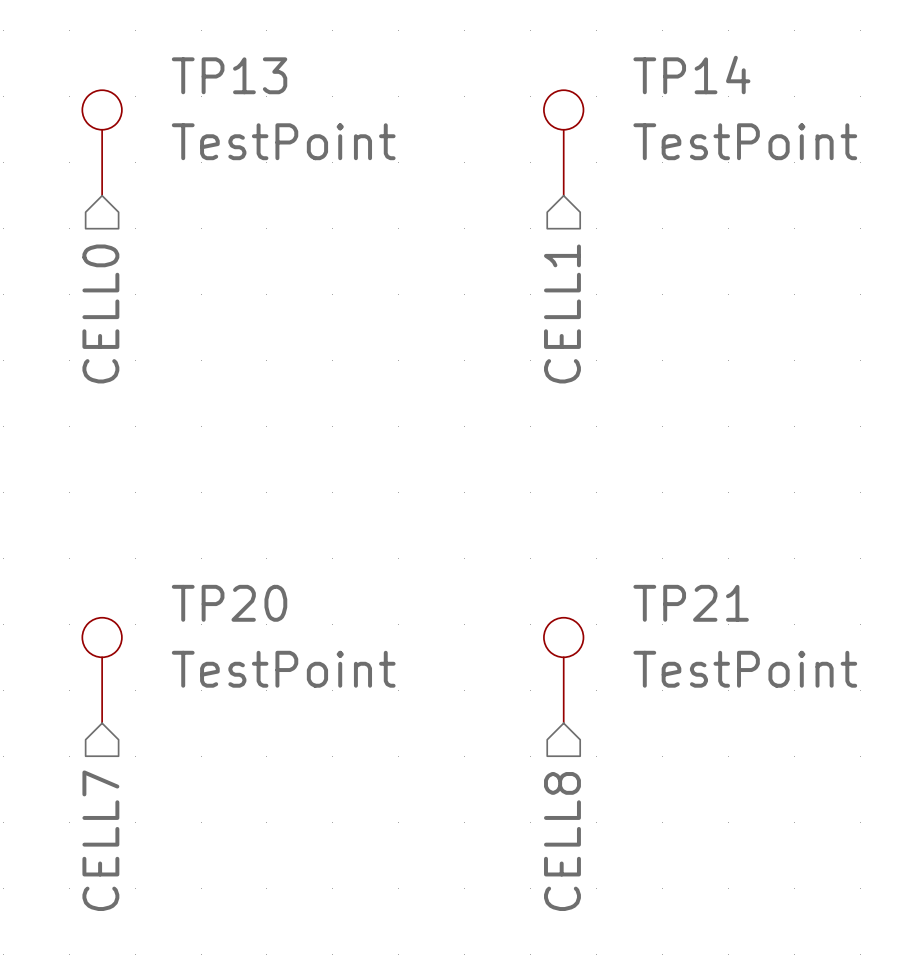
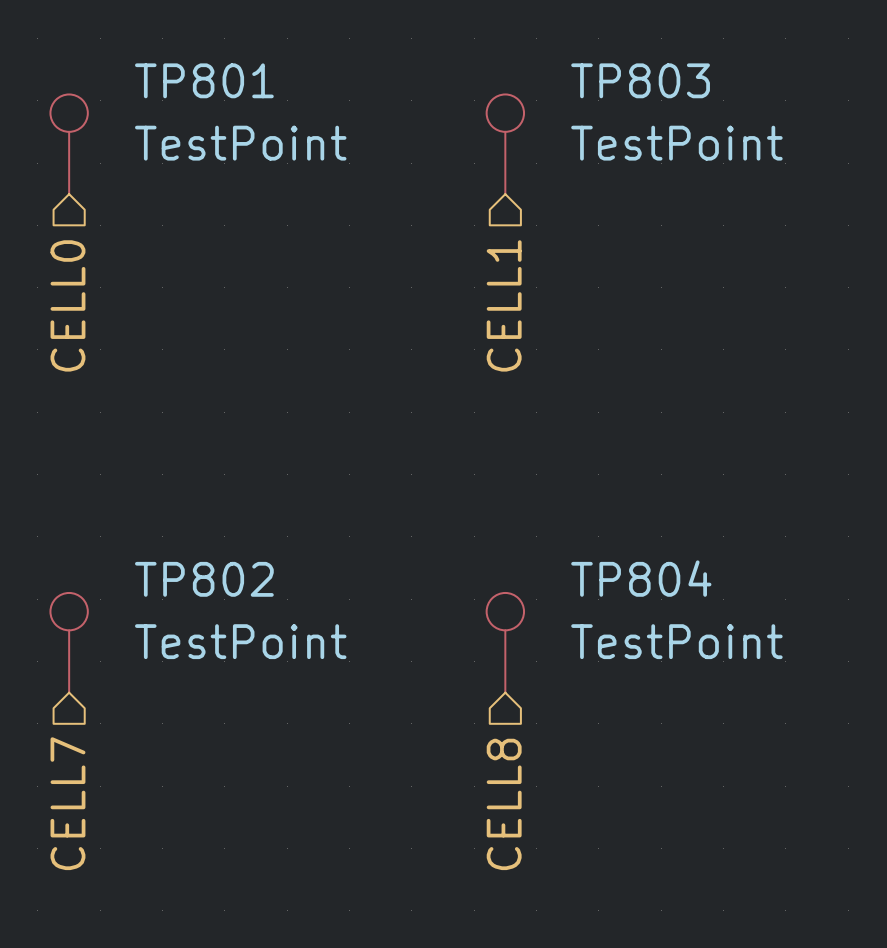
TP13 name: TP13 (229, 75) -> TP801 (204, 80)
TP14 name: TP14 (691, 75) -> TP803 (640, 80)
TP20 name: TP20 (229, 603) -> TP802 (204, 579)
TP21 name: TP21 (691, 603) -> TP804 (641, 578)

